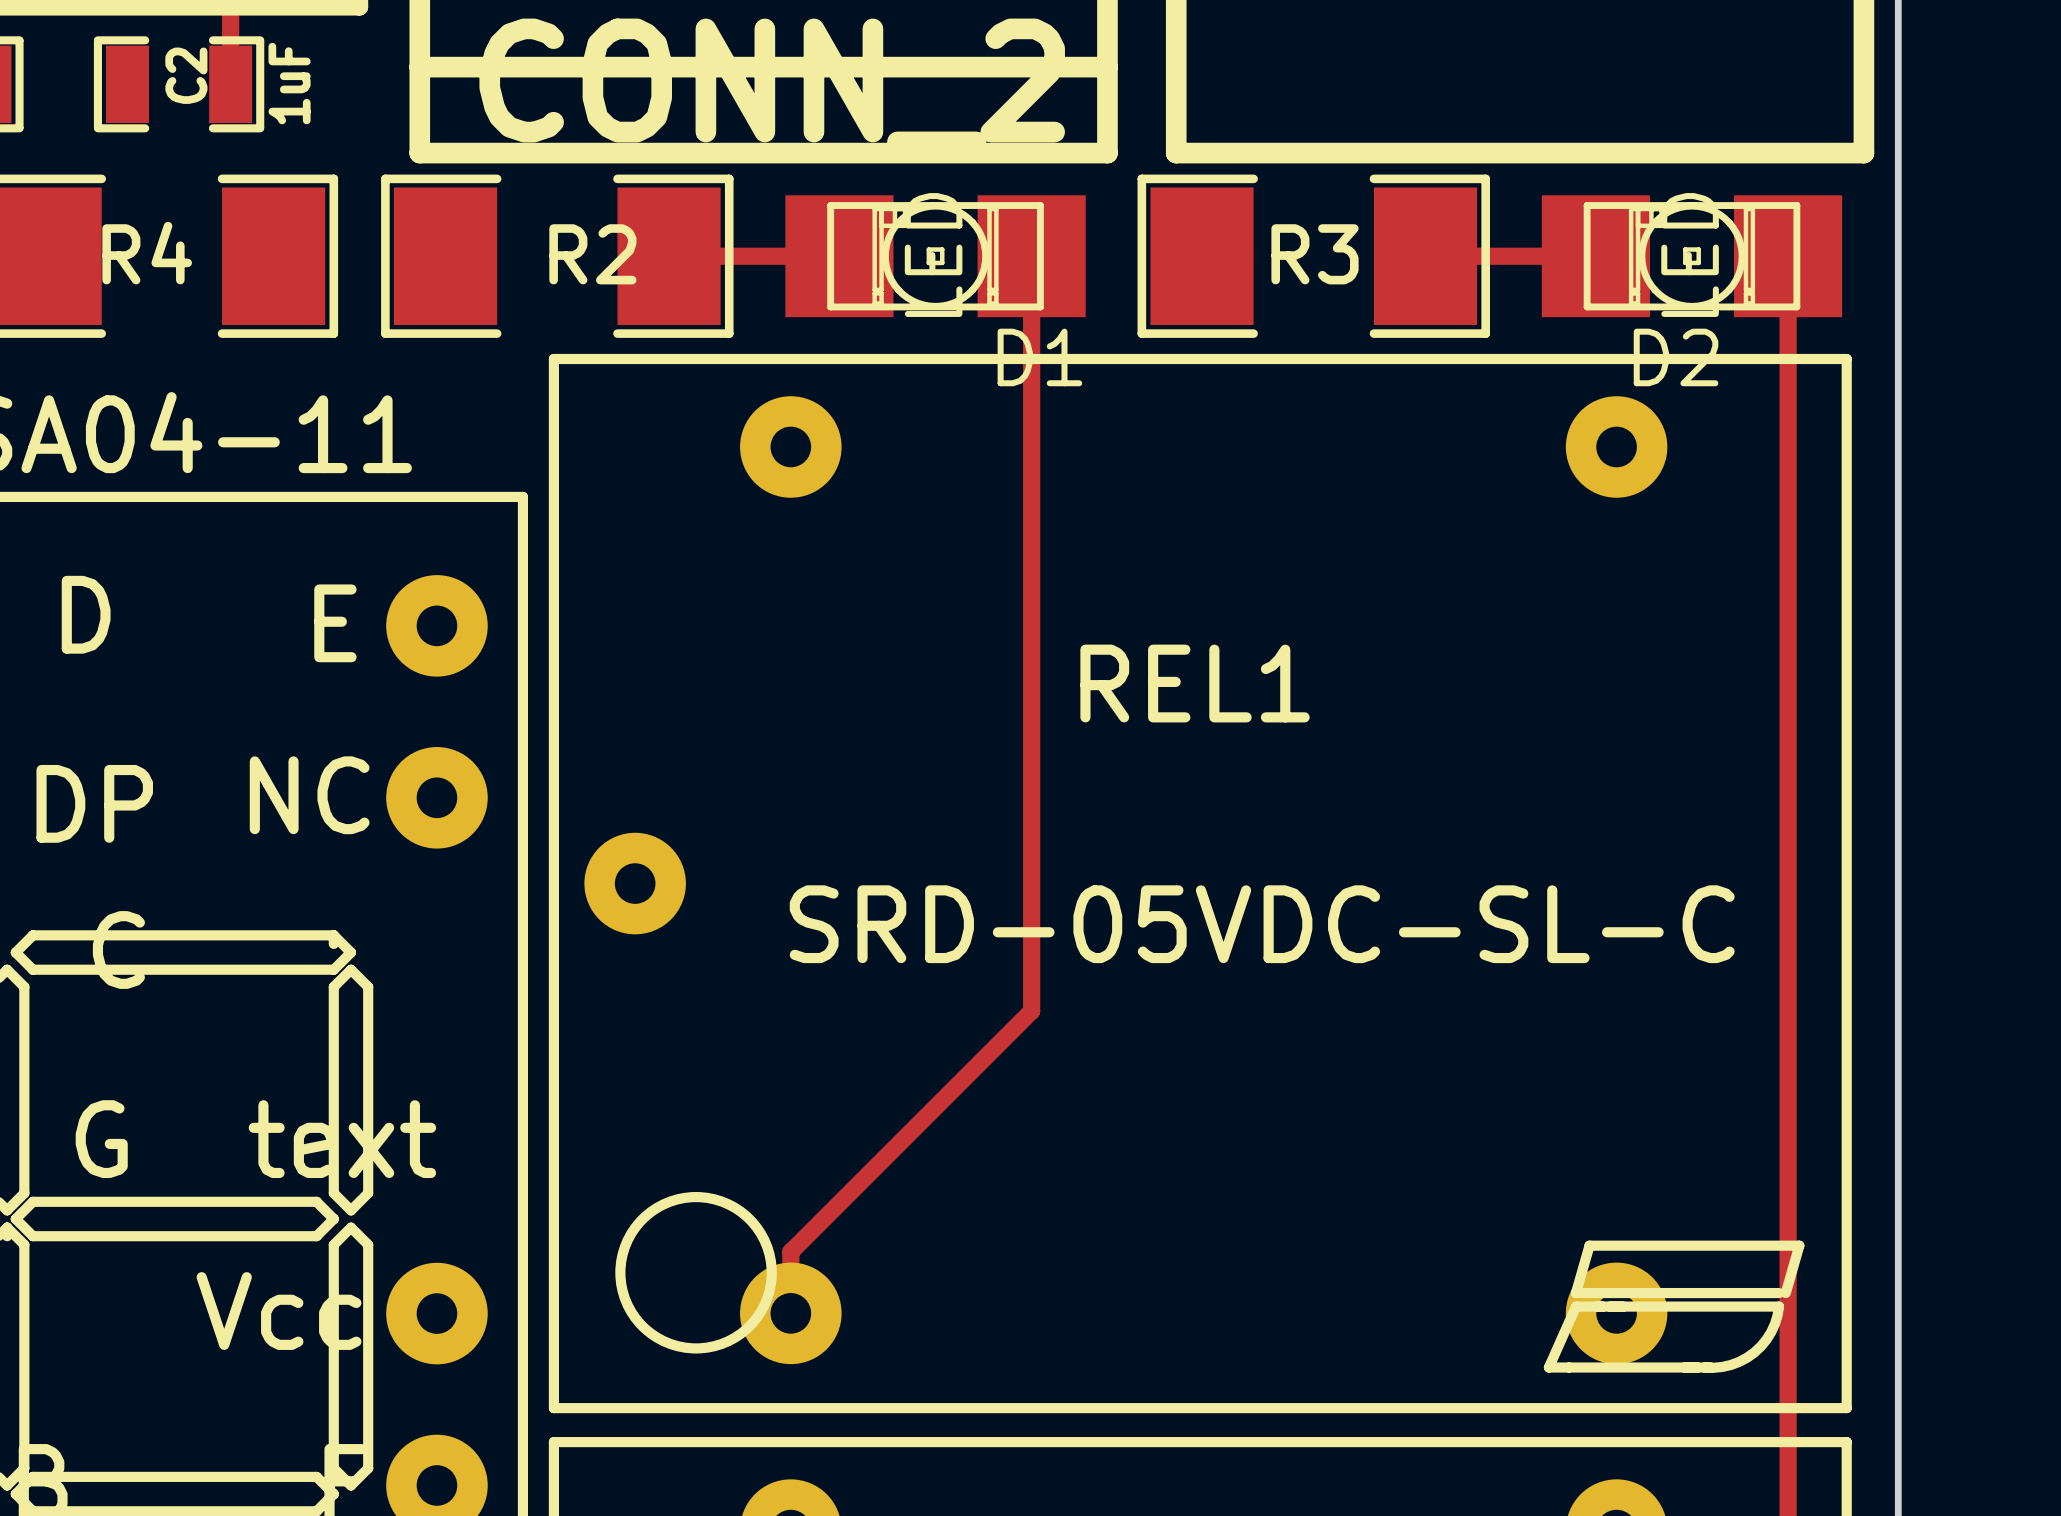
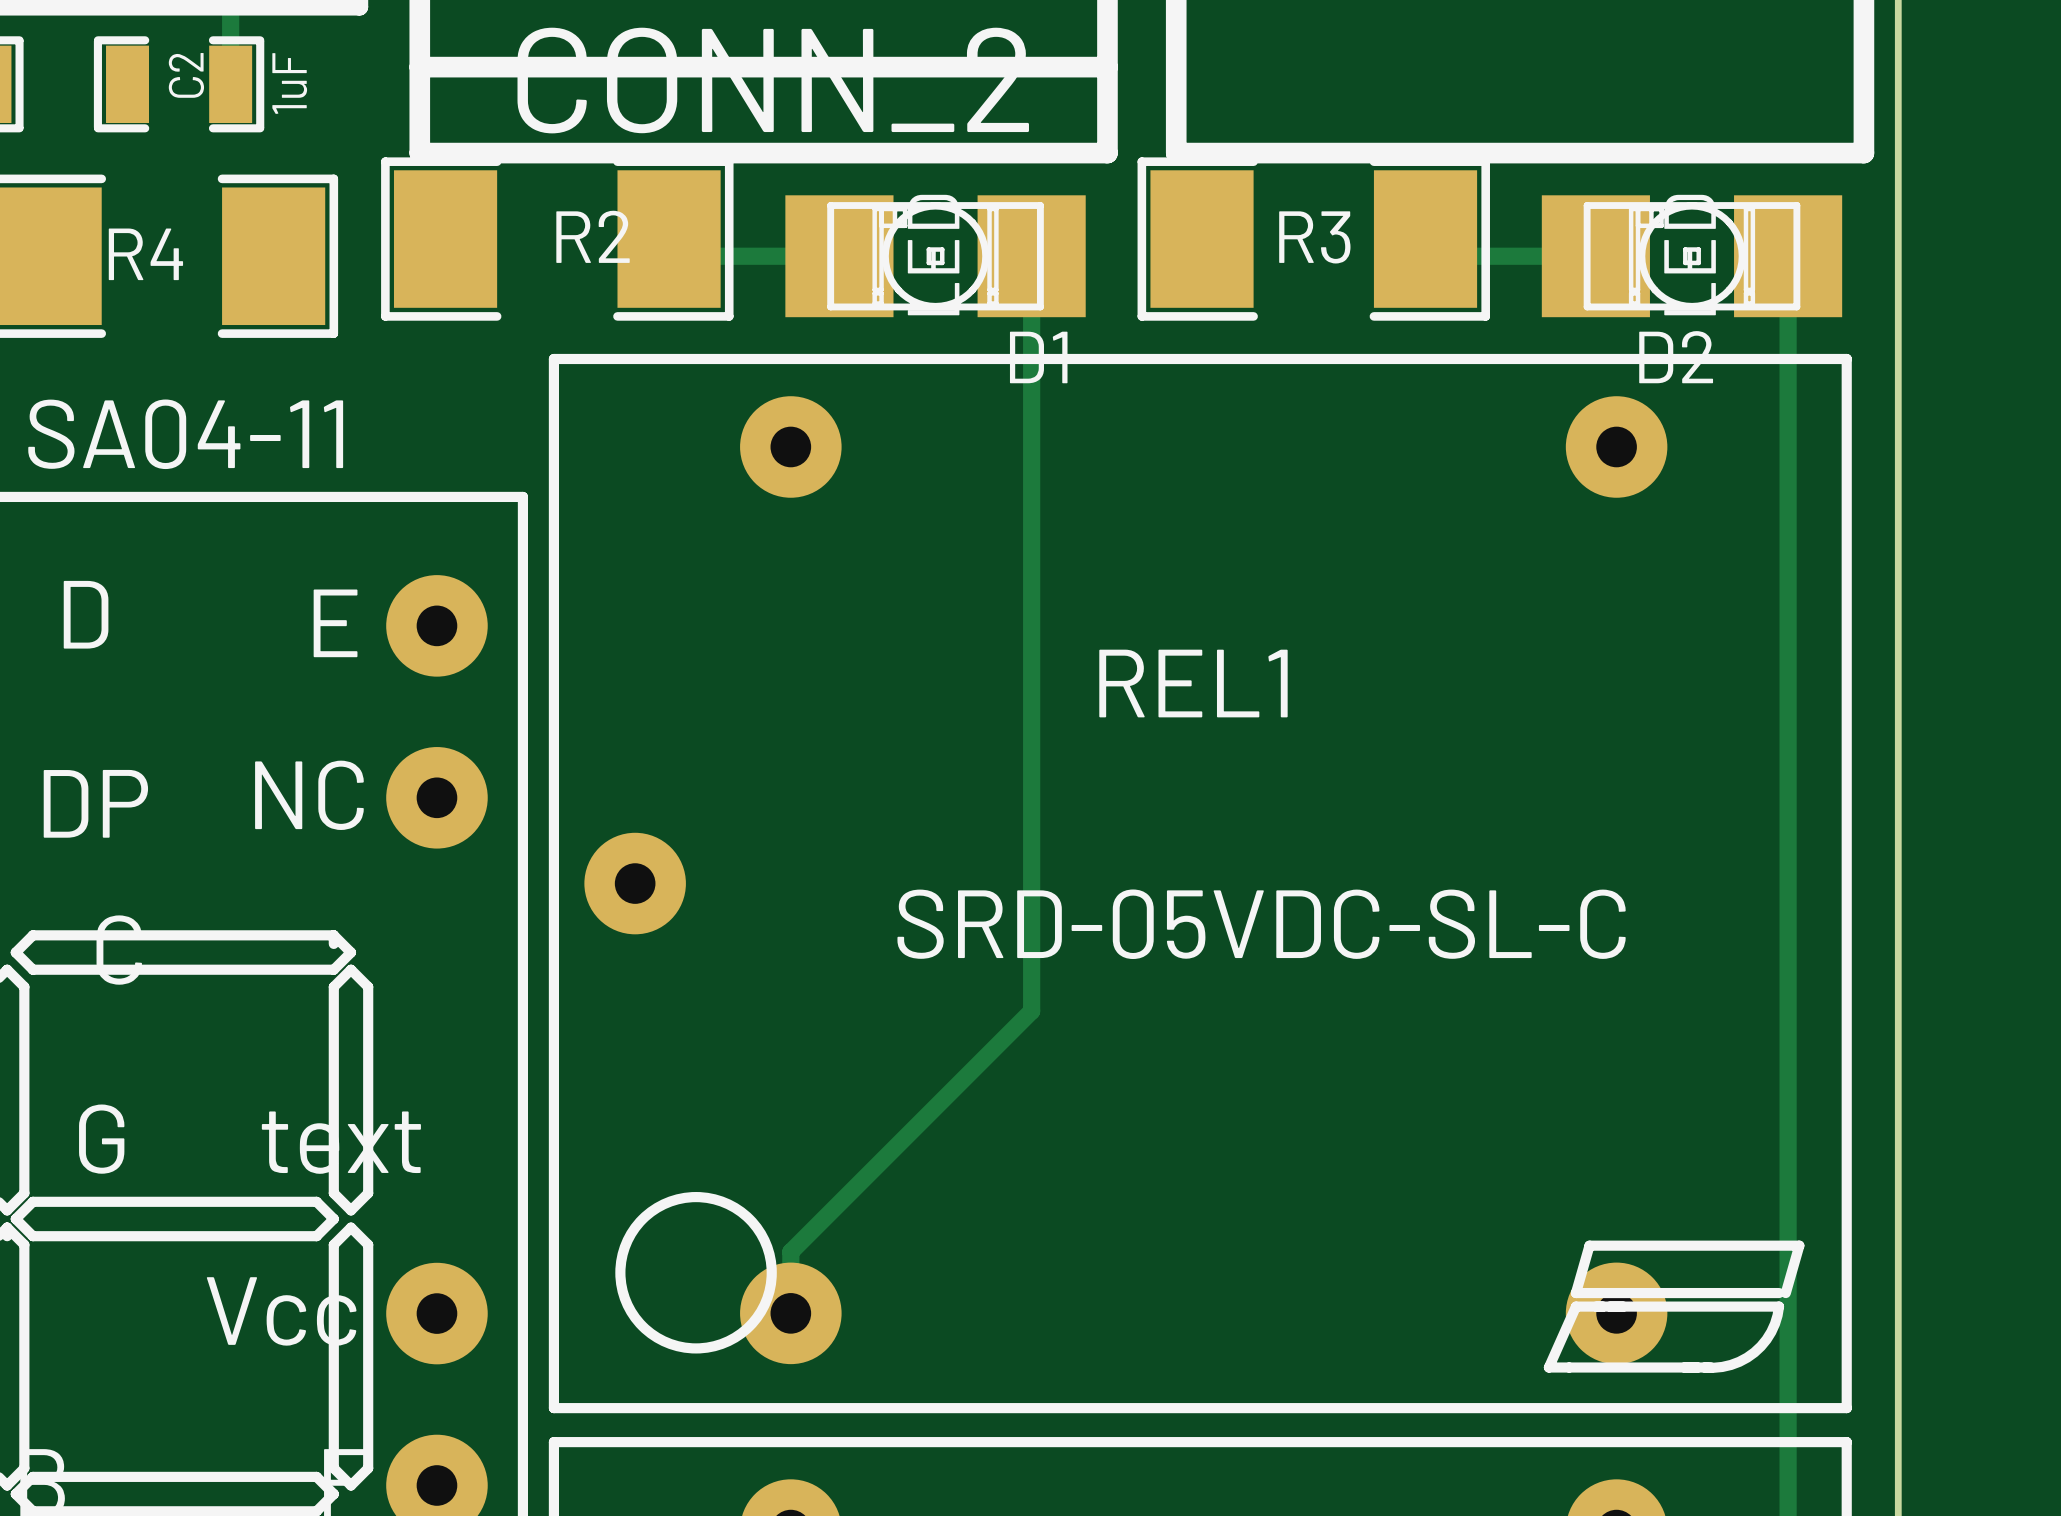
R2 position: (557, 256) -> (557, 239)
R3 position: (1313, 256) -> (1313, 239)

